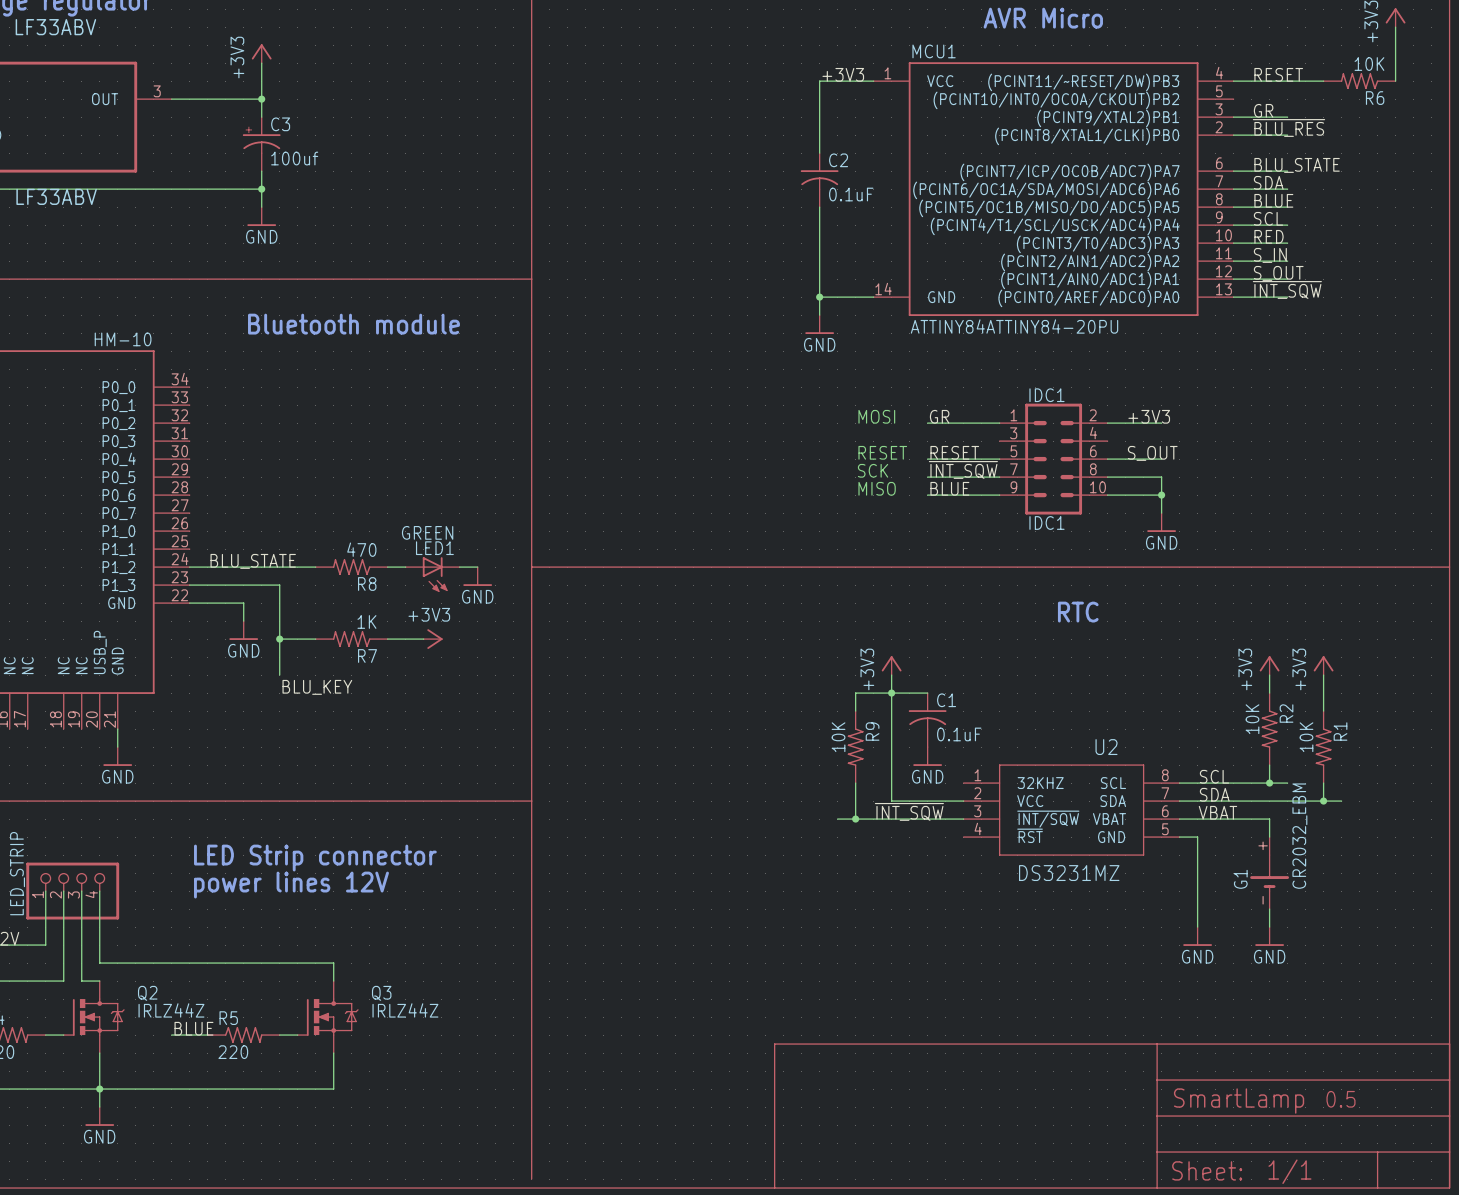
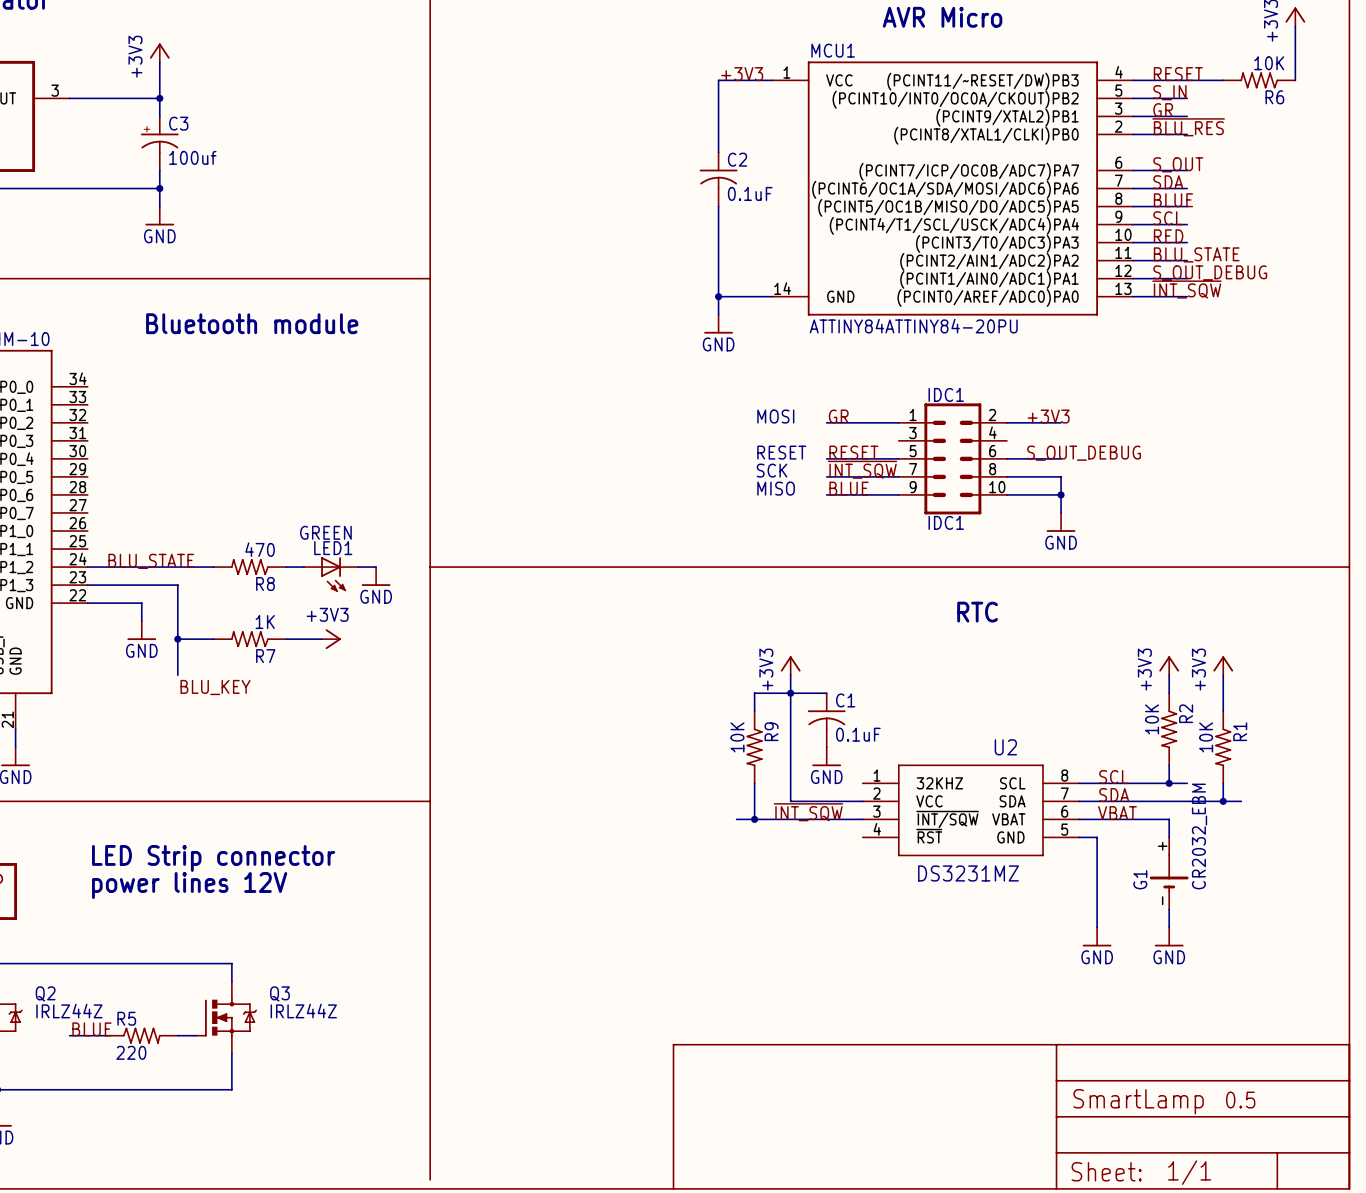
label: none -> S_IN (1169, 92)
wire: none -> (1133, 98) (1187, 98)
label: BLU_STATE (1297, 165) -> S_OUT (1178, 164)
label: S_IN (1270, 255) -> BLU_STATE (1196, 254)
label: S_OUT (1278, 273) -> S_OUT_DEBUG (1210, 272)
label: S_OUT (1152, 453) -> S_OUT_DEBUG (1084, 453)

